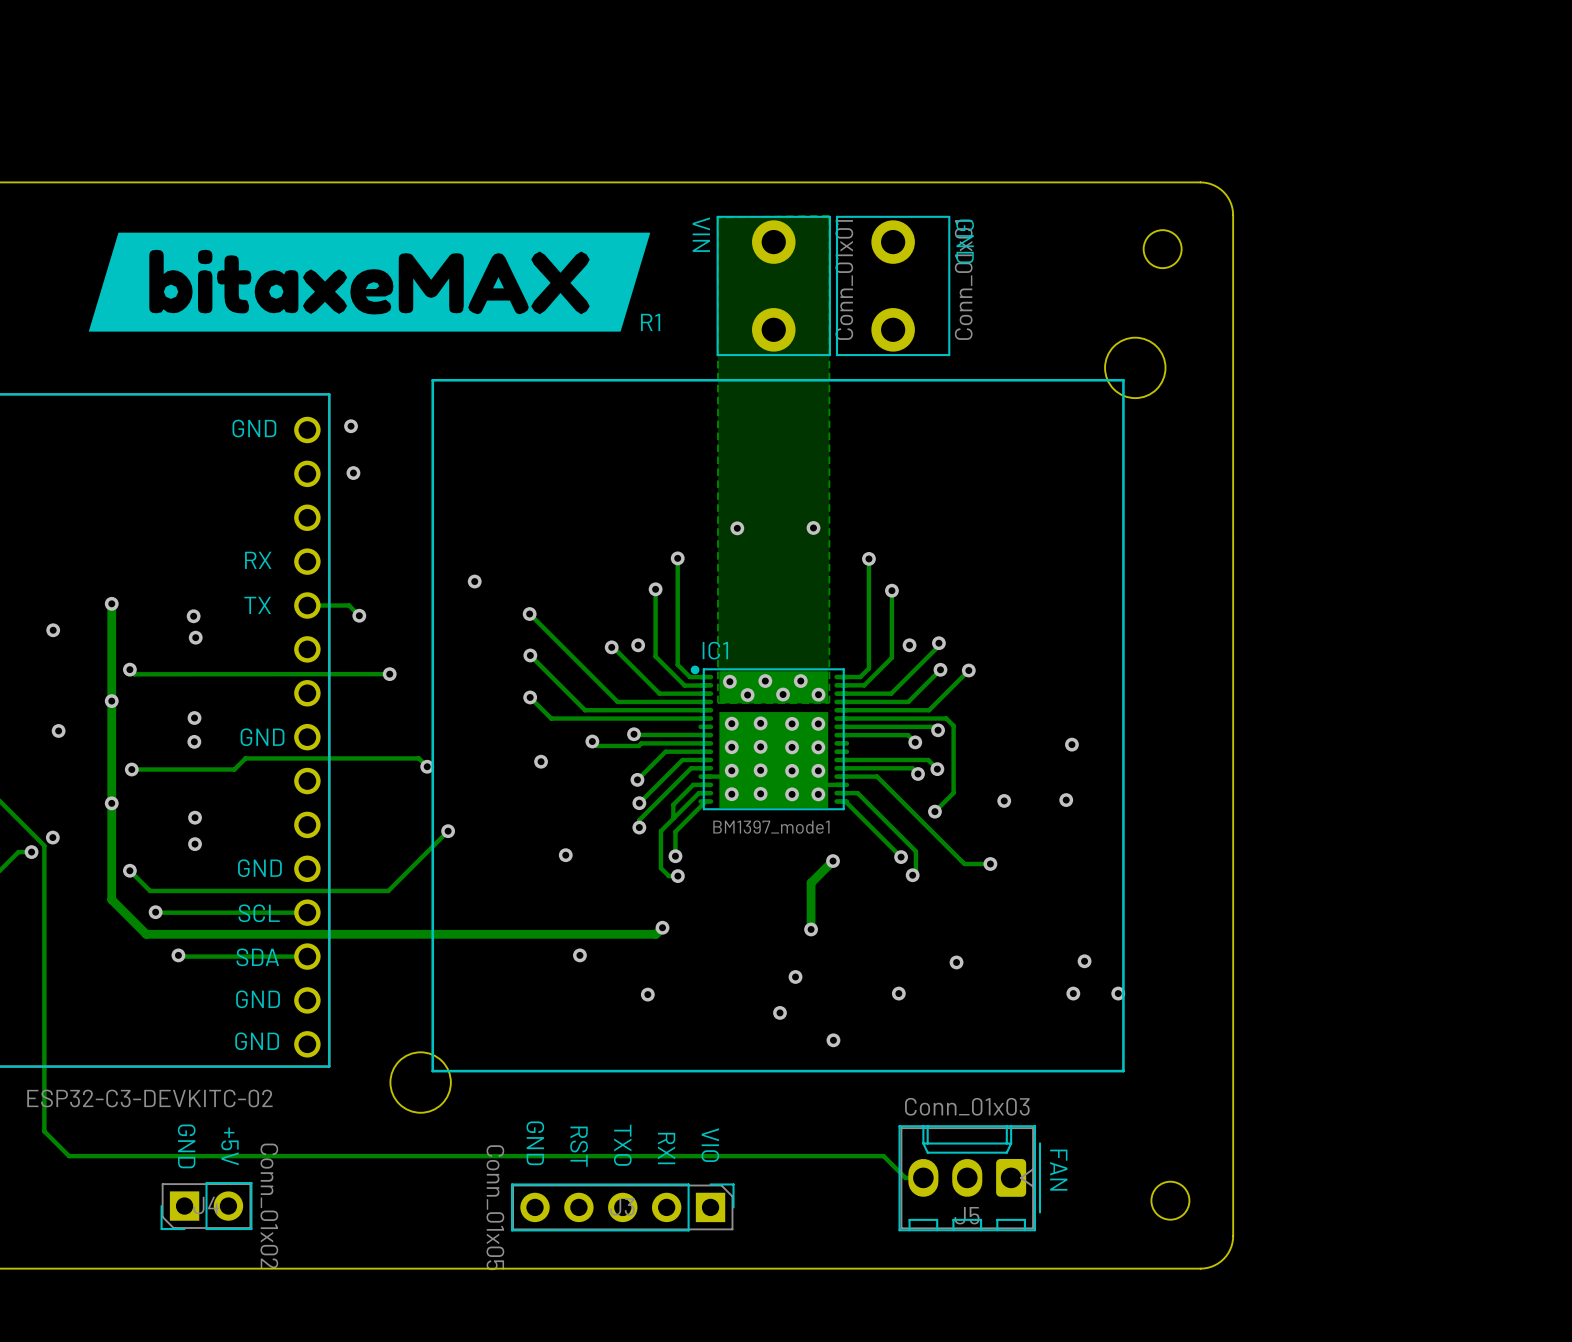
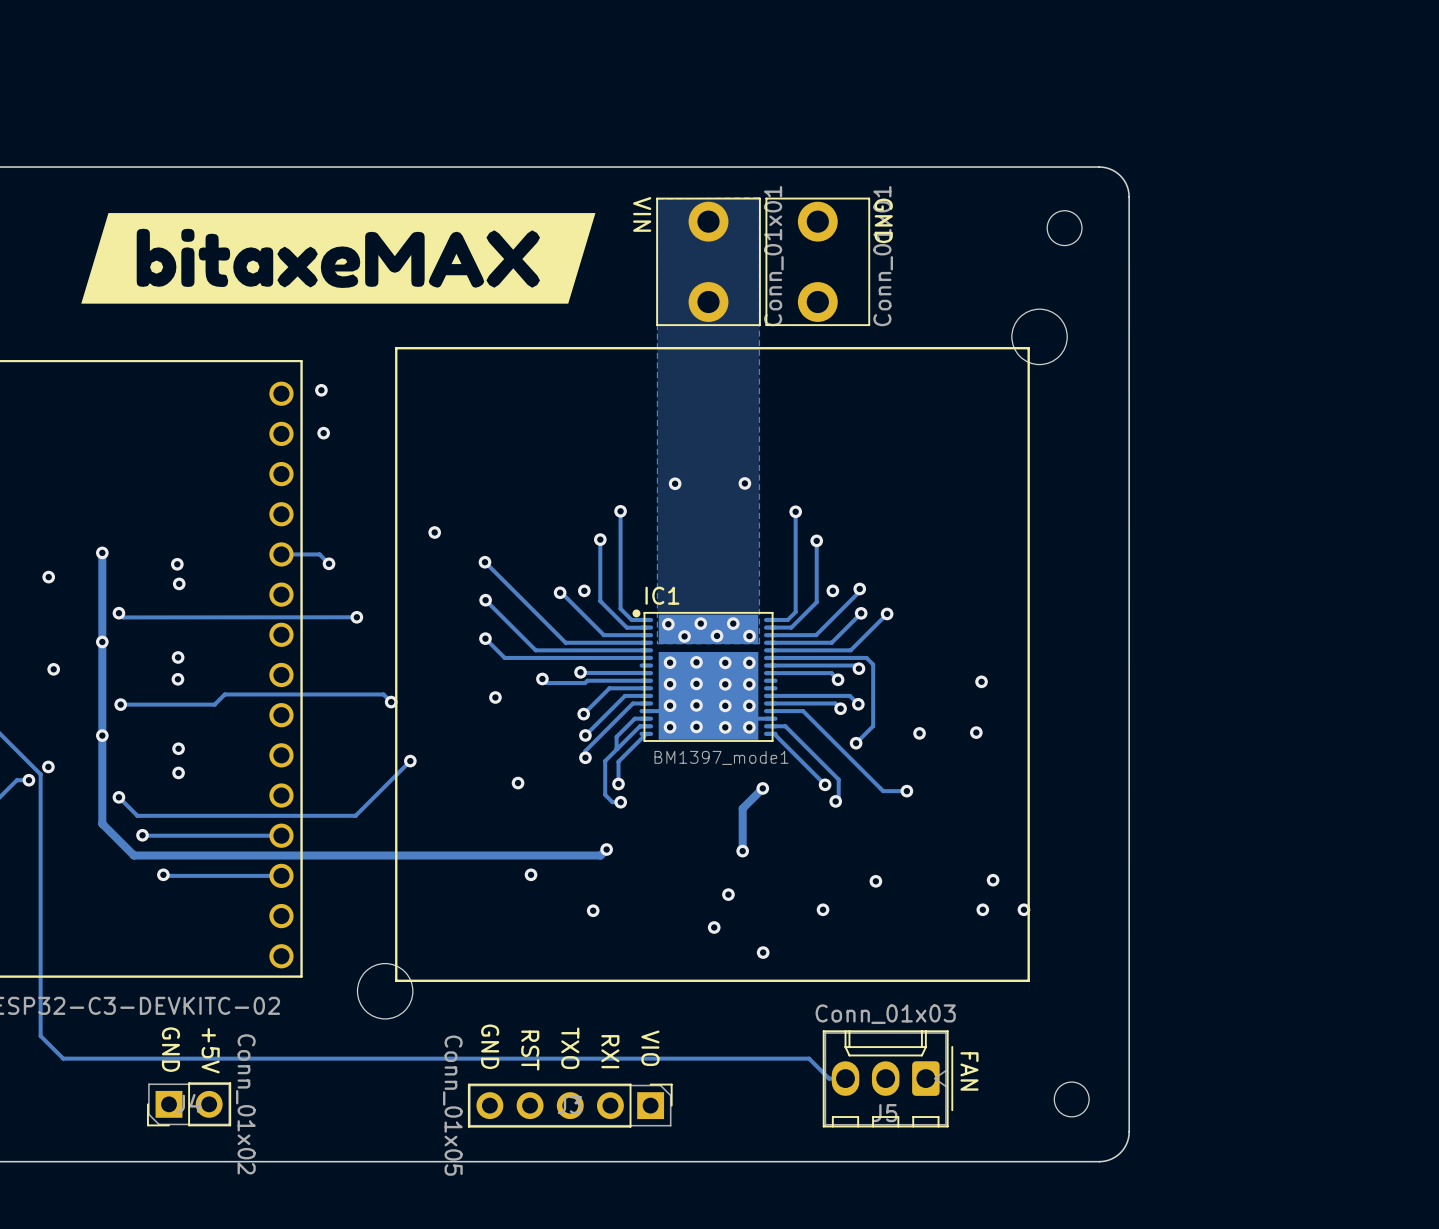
text: R1 (650, 322) -> none
text: GND (254, 428) -> none
text: RX (258, 560) -> none
text: TX (257, 605) -> none
text: GND (262, 737) -> none
text: GND (259, 868) -> none
text: SCL (259, 913) -> none
text: SDA (257, 957) -> none
text: GND (258, 999) -> none
text: GND (257, 1041) -> none

